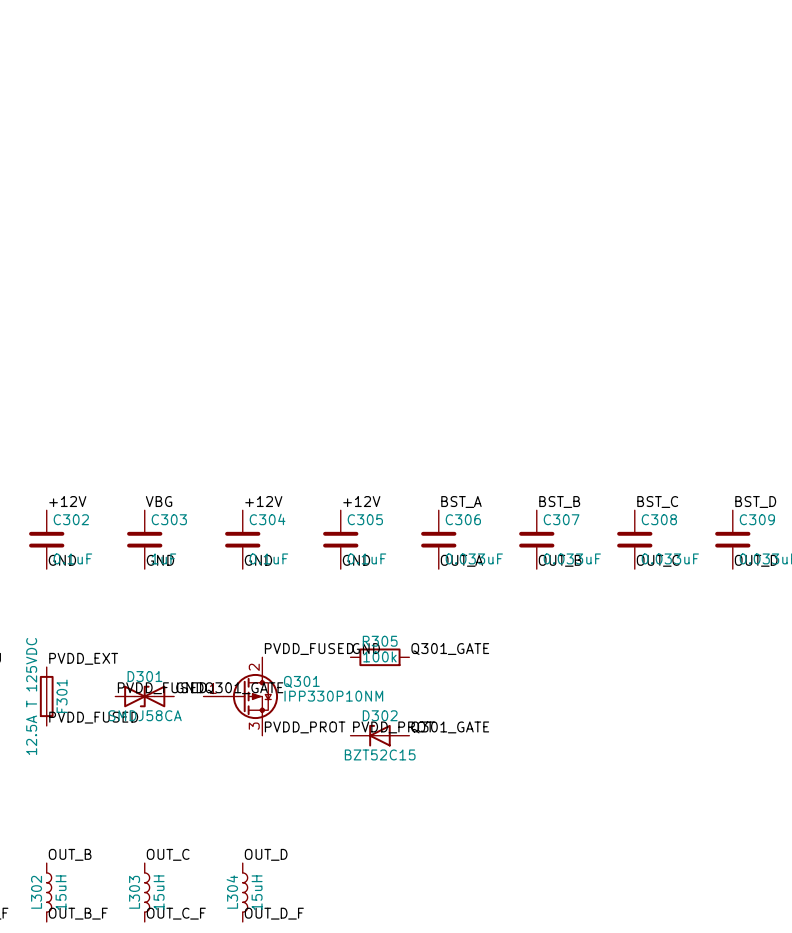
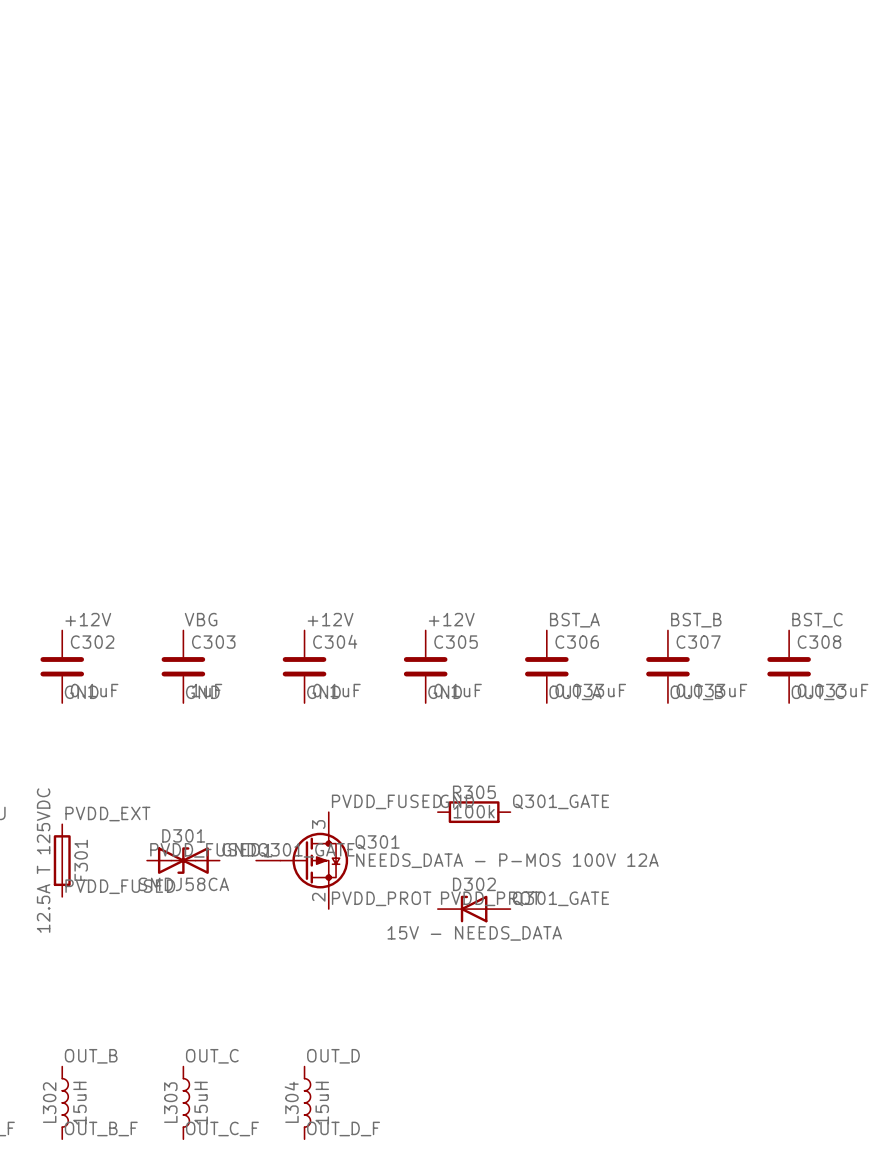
Q301 pin number: 2 (254, 667) -> 3 (318, 824)
Q301 value: IPP330P10NM (333, 696) -> NEEDS_DATA - P-MOS 100V 12A (507, 860)
Q301 pin number: 3 (254, 726) -> 2 (318, 897)
D302 value: BZT52C15 (380, 754) -> 15V - NEEDS_DATA (474, 933)

